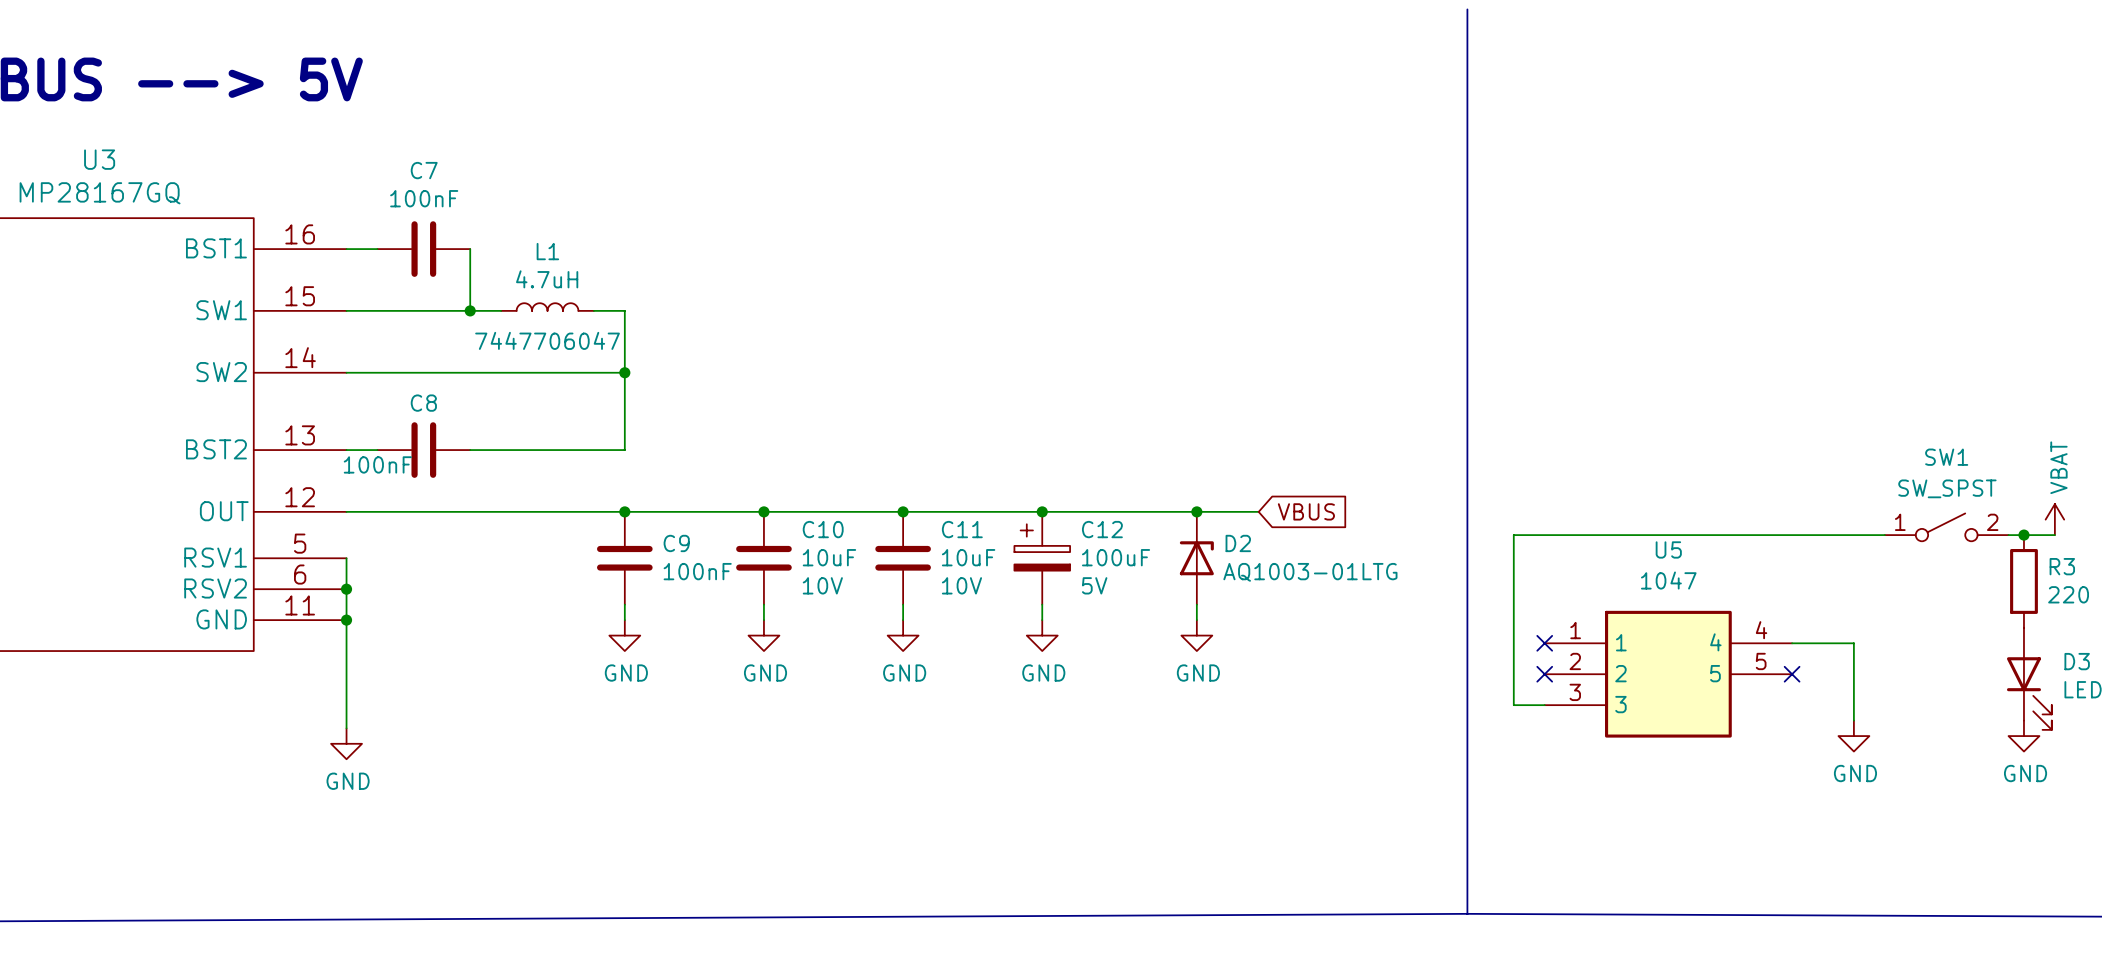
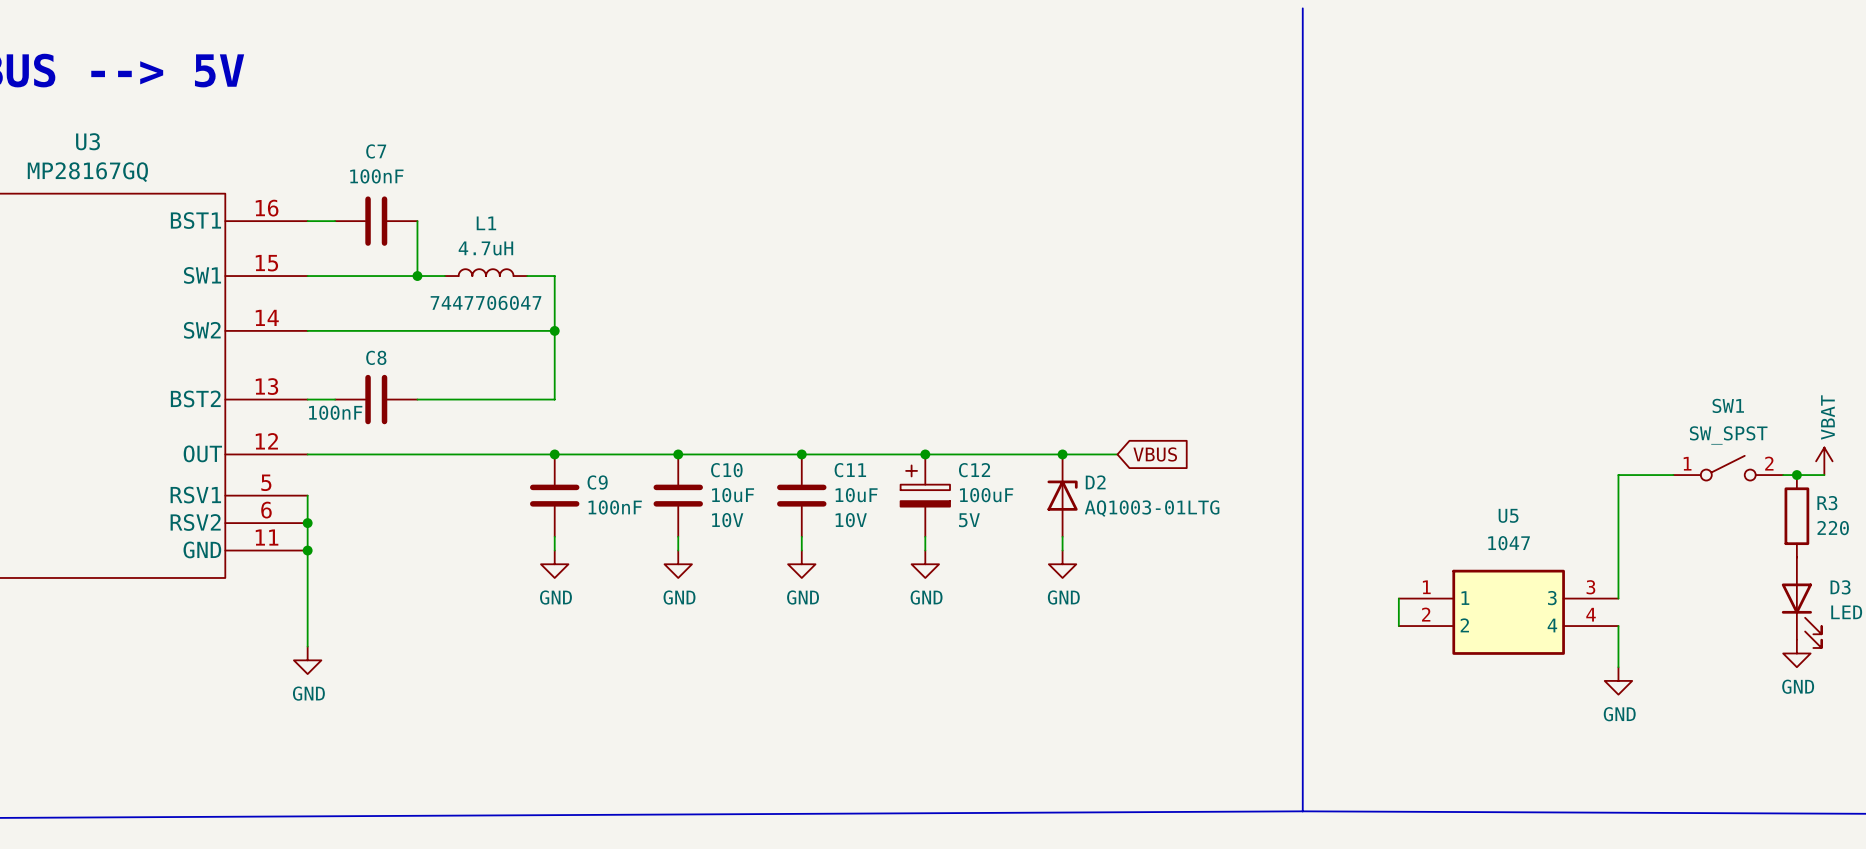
wire: (1823, 535) (1513, 535) (1513, 705) (1544, 705) -> (1618, 475) (1618, 598)
U5 symbol: [1544, 610, 1793, 738] -> [1398, 569, 1619, 655]
no-connect mark: (1544, 643) -> none
wire: (1792, 643) (1853, 643) (1853, 720) -> none
no-connect mark: (1544, 674) -> none
wire: none -> (1398, 598) (1398, 626)
no-connect mark: (1792, 674) -> none
wire: none -> (1618, 626) (1618, 667)
power symbol position: GND (1853, 736) -> GND (1618, 680)

